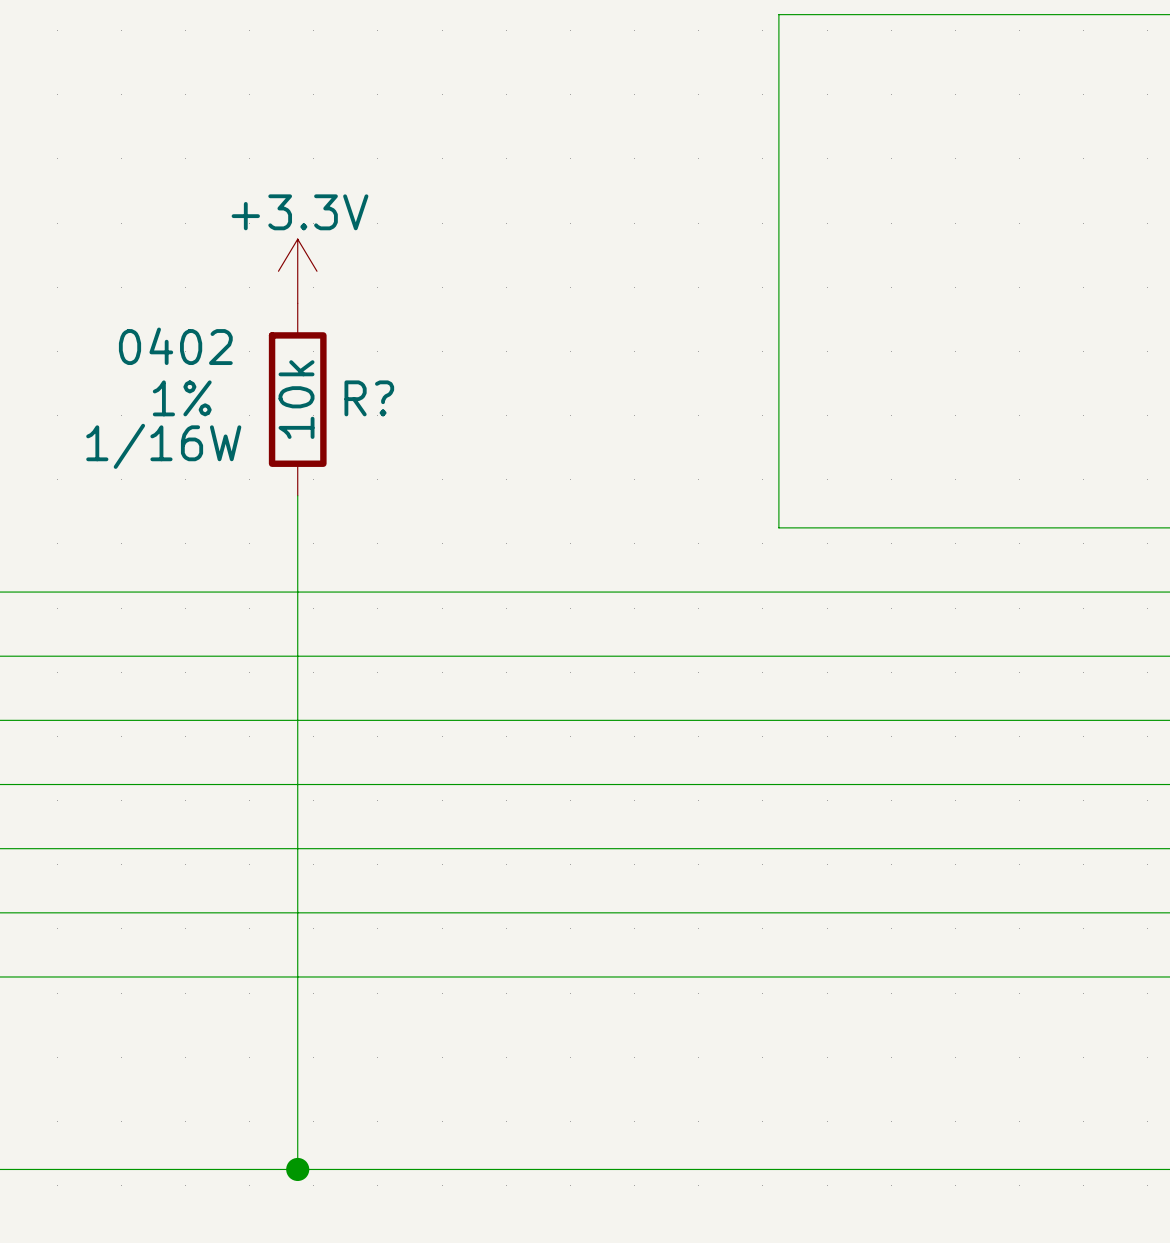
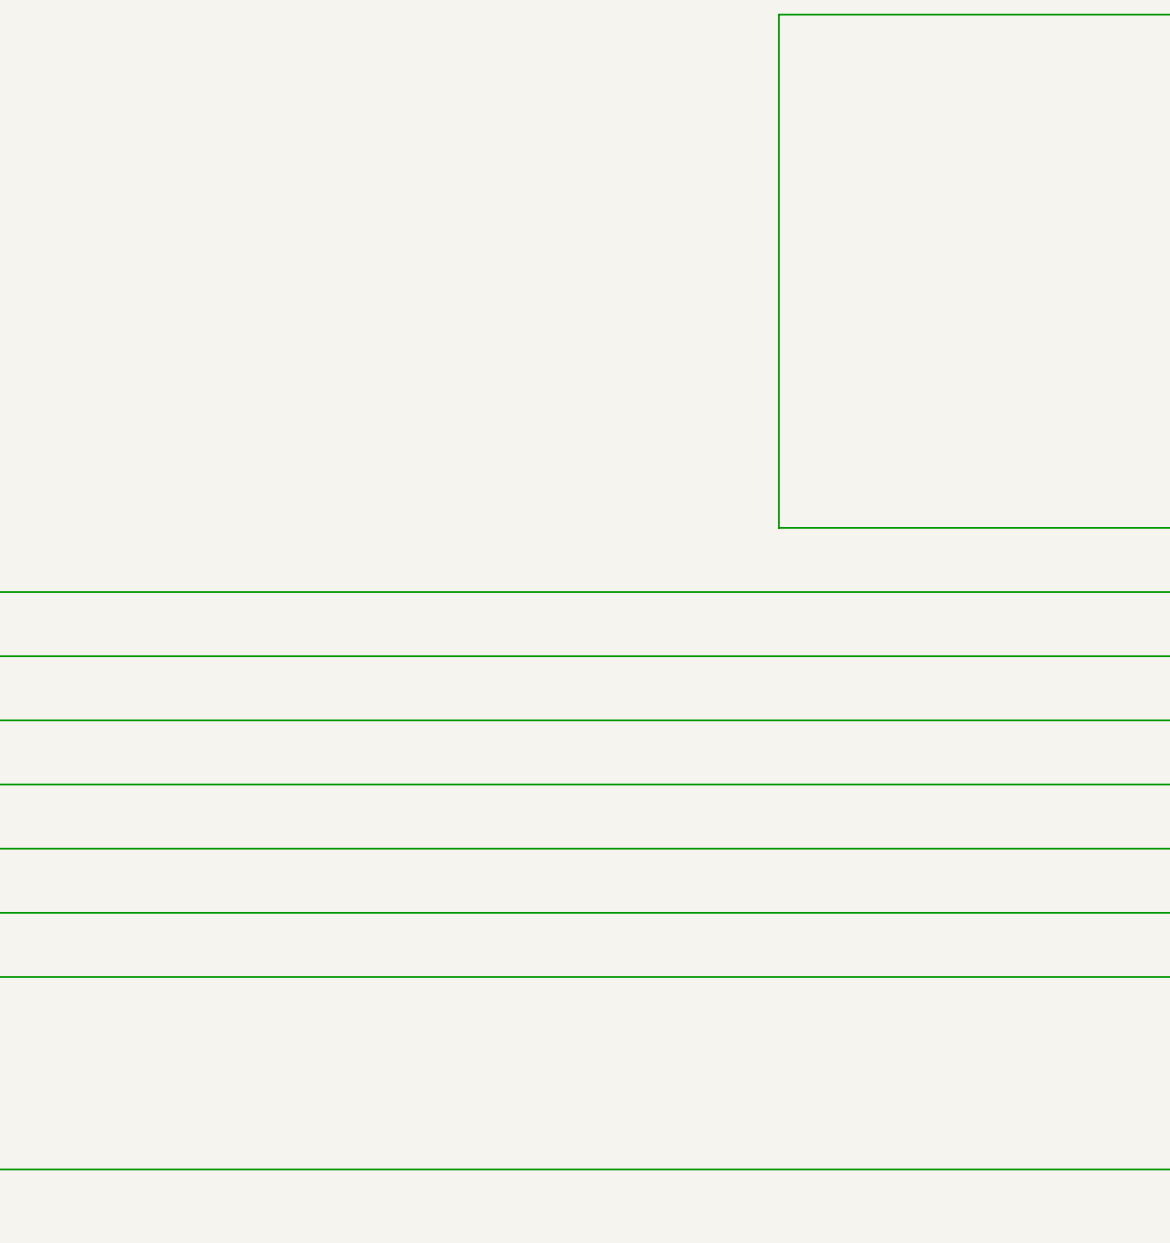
power symbol: +3.3V (297, 271) -> none
R?: 10k (297, 399) -> none
wire: (297, 495) (297, 1169) -> none
junction: (297, 1169) -> none

